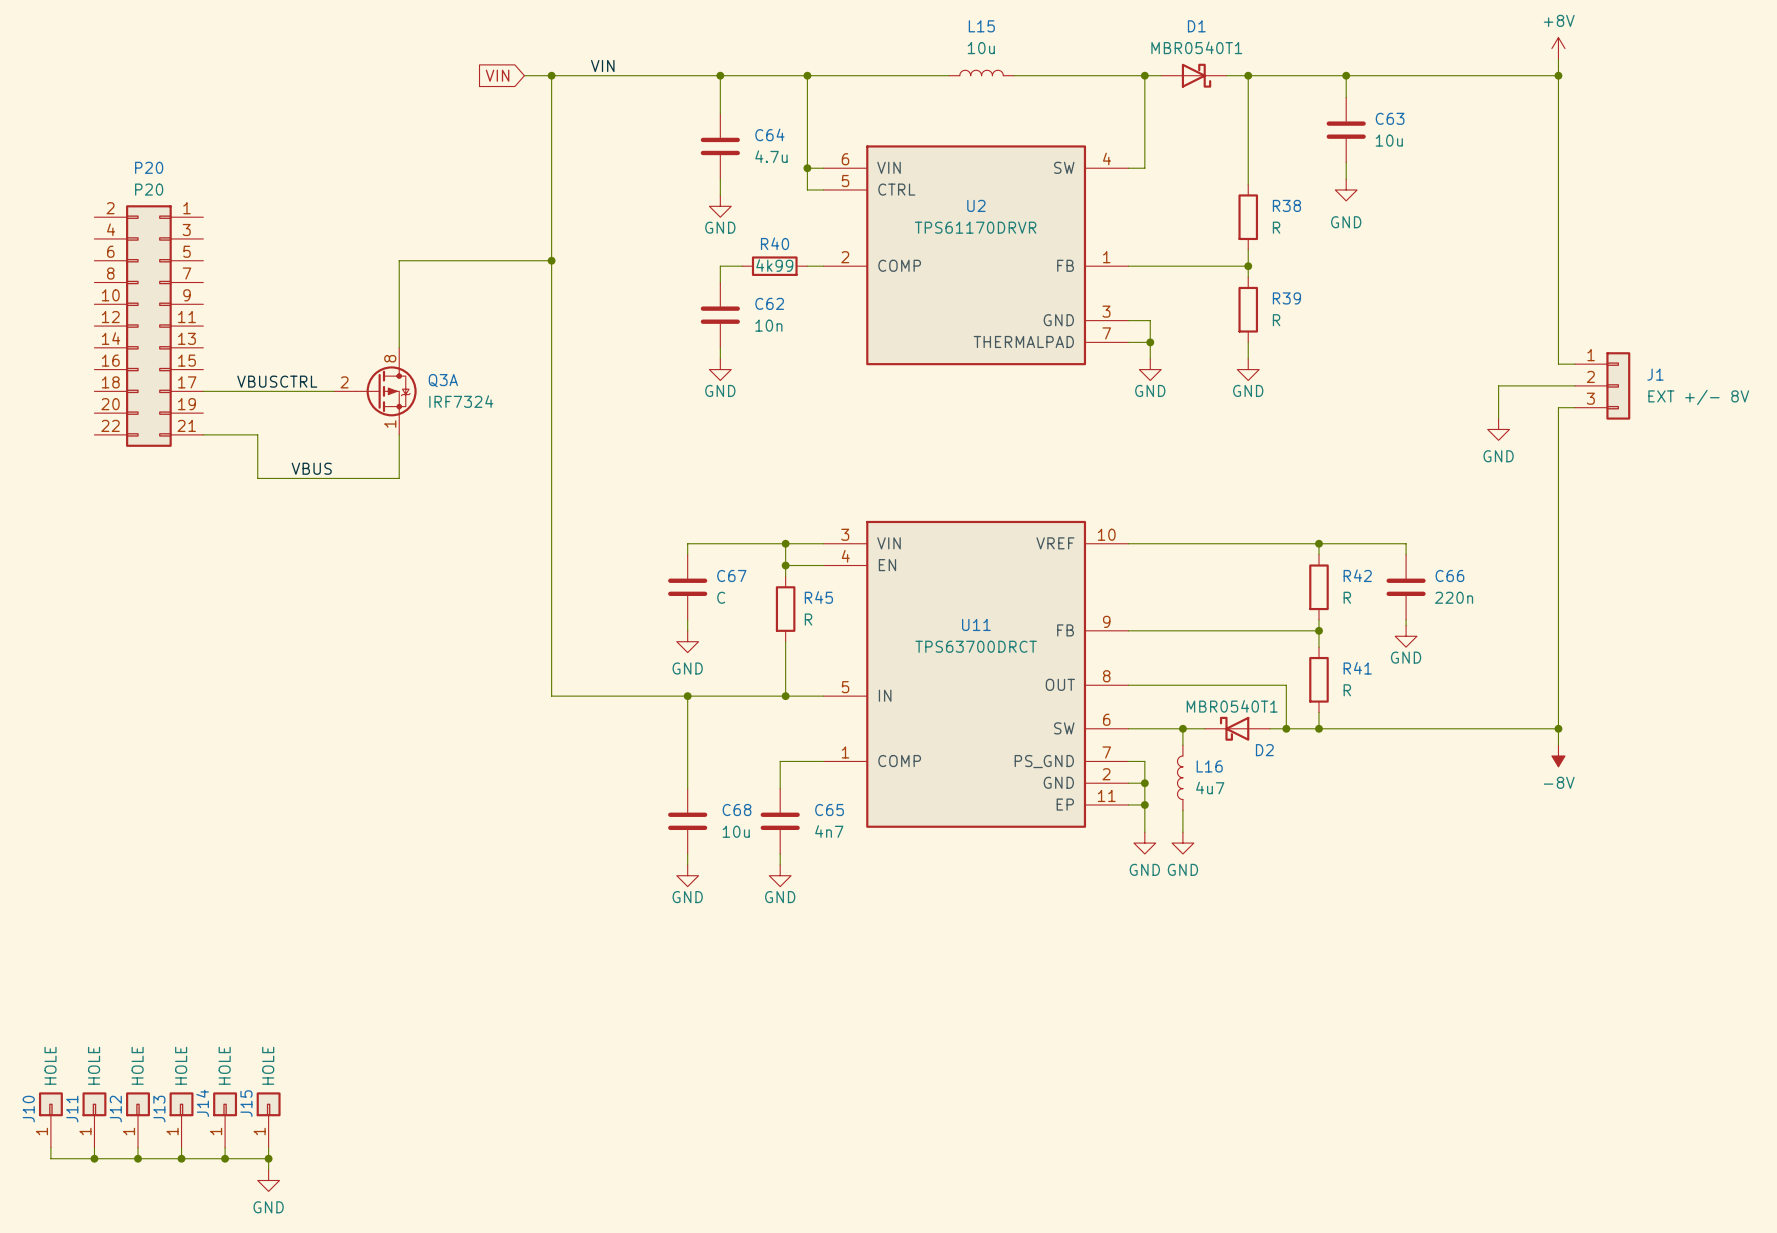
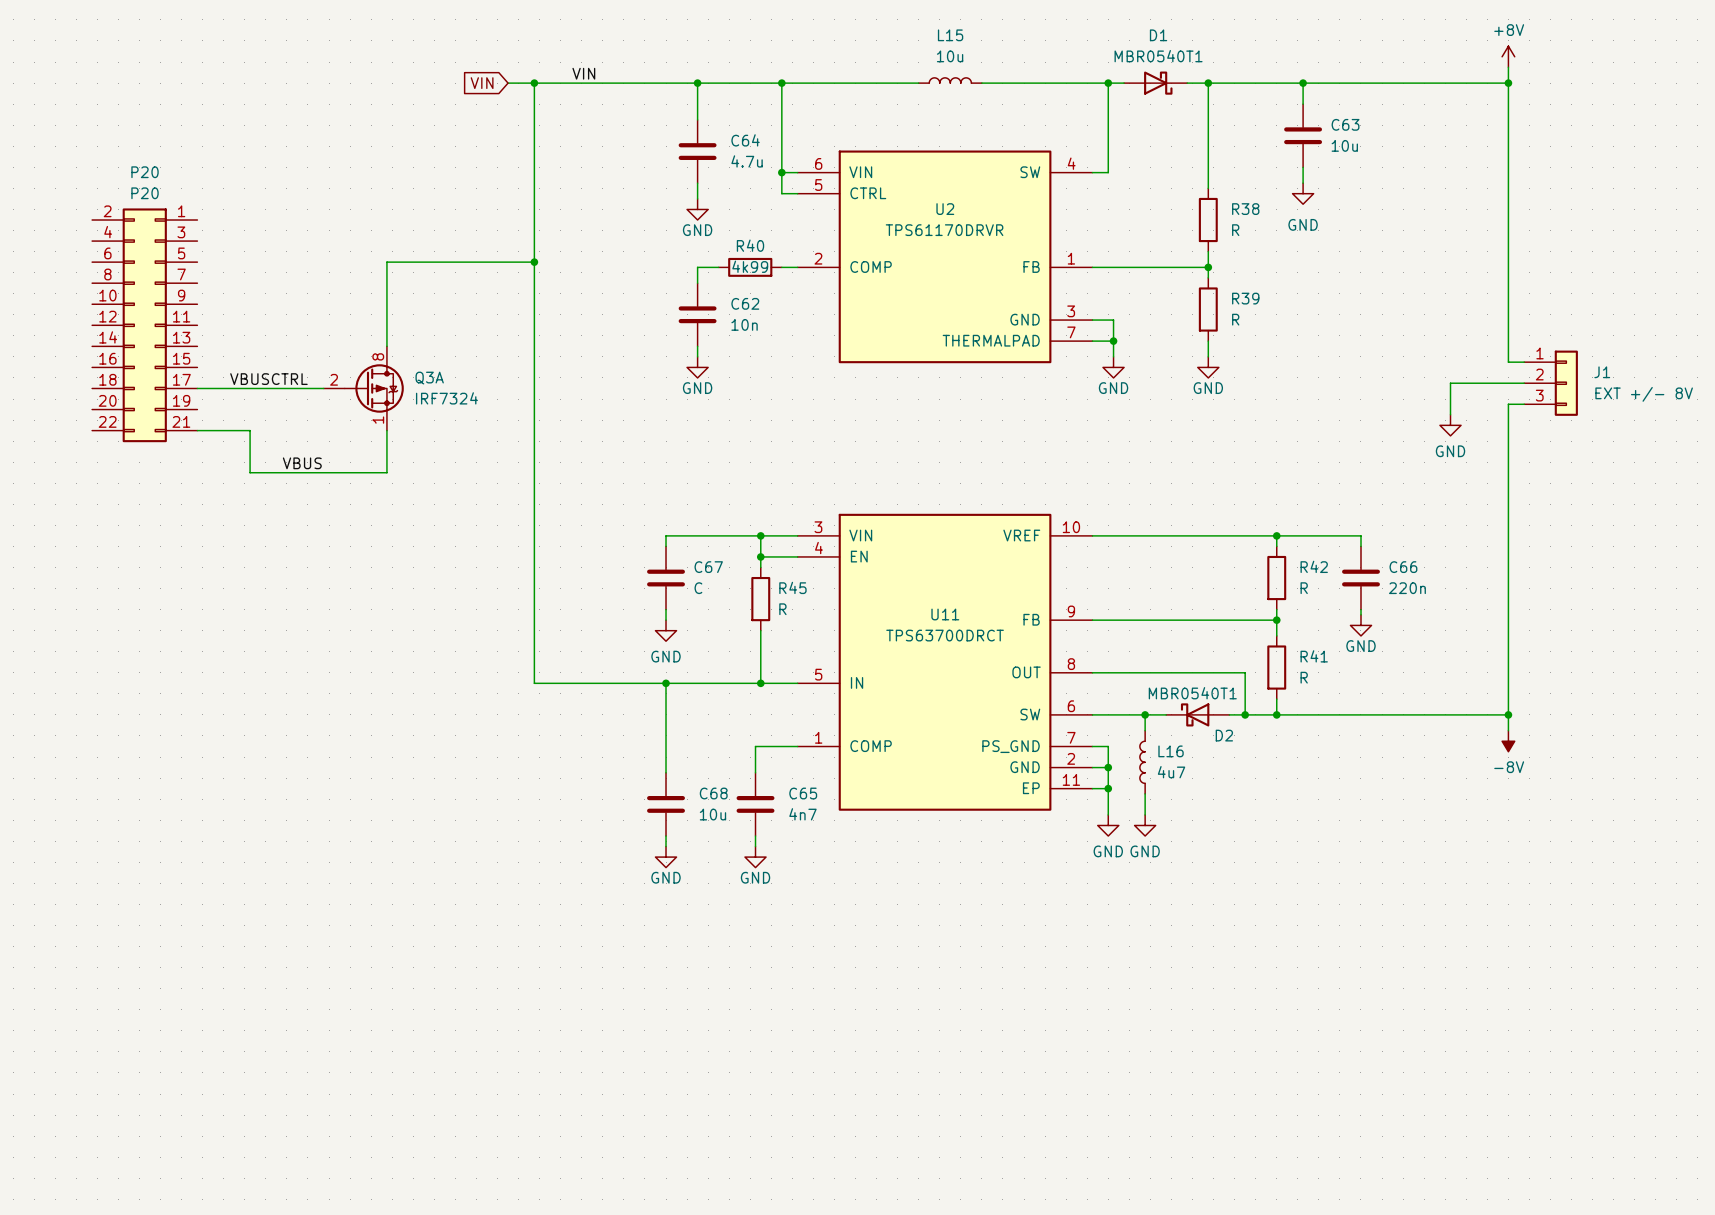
J10: HOLE (50, 1120) -> none
J11: HOLE (94, 1120) -> none
J12: HOLE (138, 1120) -> none
J13: HOLE (181, 1120) -> none
J14: HOLE (225, 1120) -> none
J15: HOLE (268, 1120) -> none
wire: (50, 1147) (50, 1158) (268, 1158) -> none
wire: (94, 1147) (94, 1158) -> none
wire: (138, 1147) (138, 1158) -> none
wire: (181, 1147) (181, 1158) -> none
wire: (225, 1147) (225, 1158) -> none
wire: (268, 1147) (268, 1169) -> none
junction: (94, 1158) -> none
junction: (138, 1158) -> none
junction: (181, 1158) -> none
junction: (225, 1158) -> none
junction: (268, 1158) -> none
power symbol: GND (268, 1180) -> none

